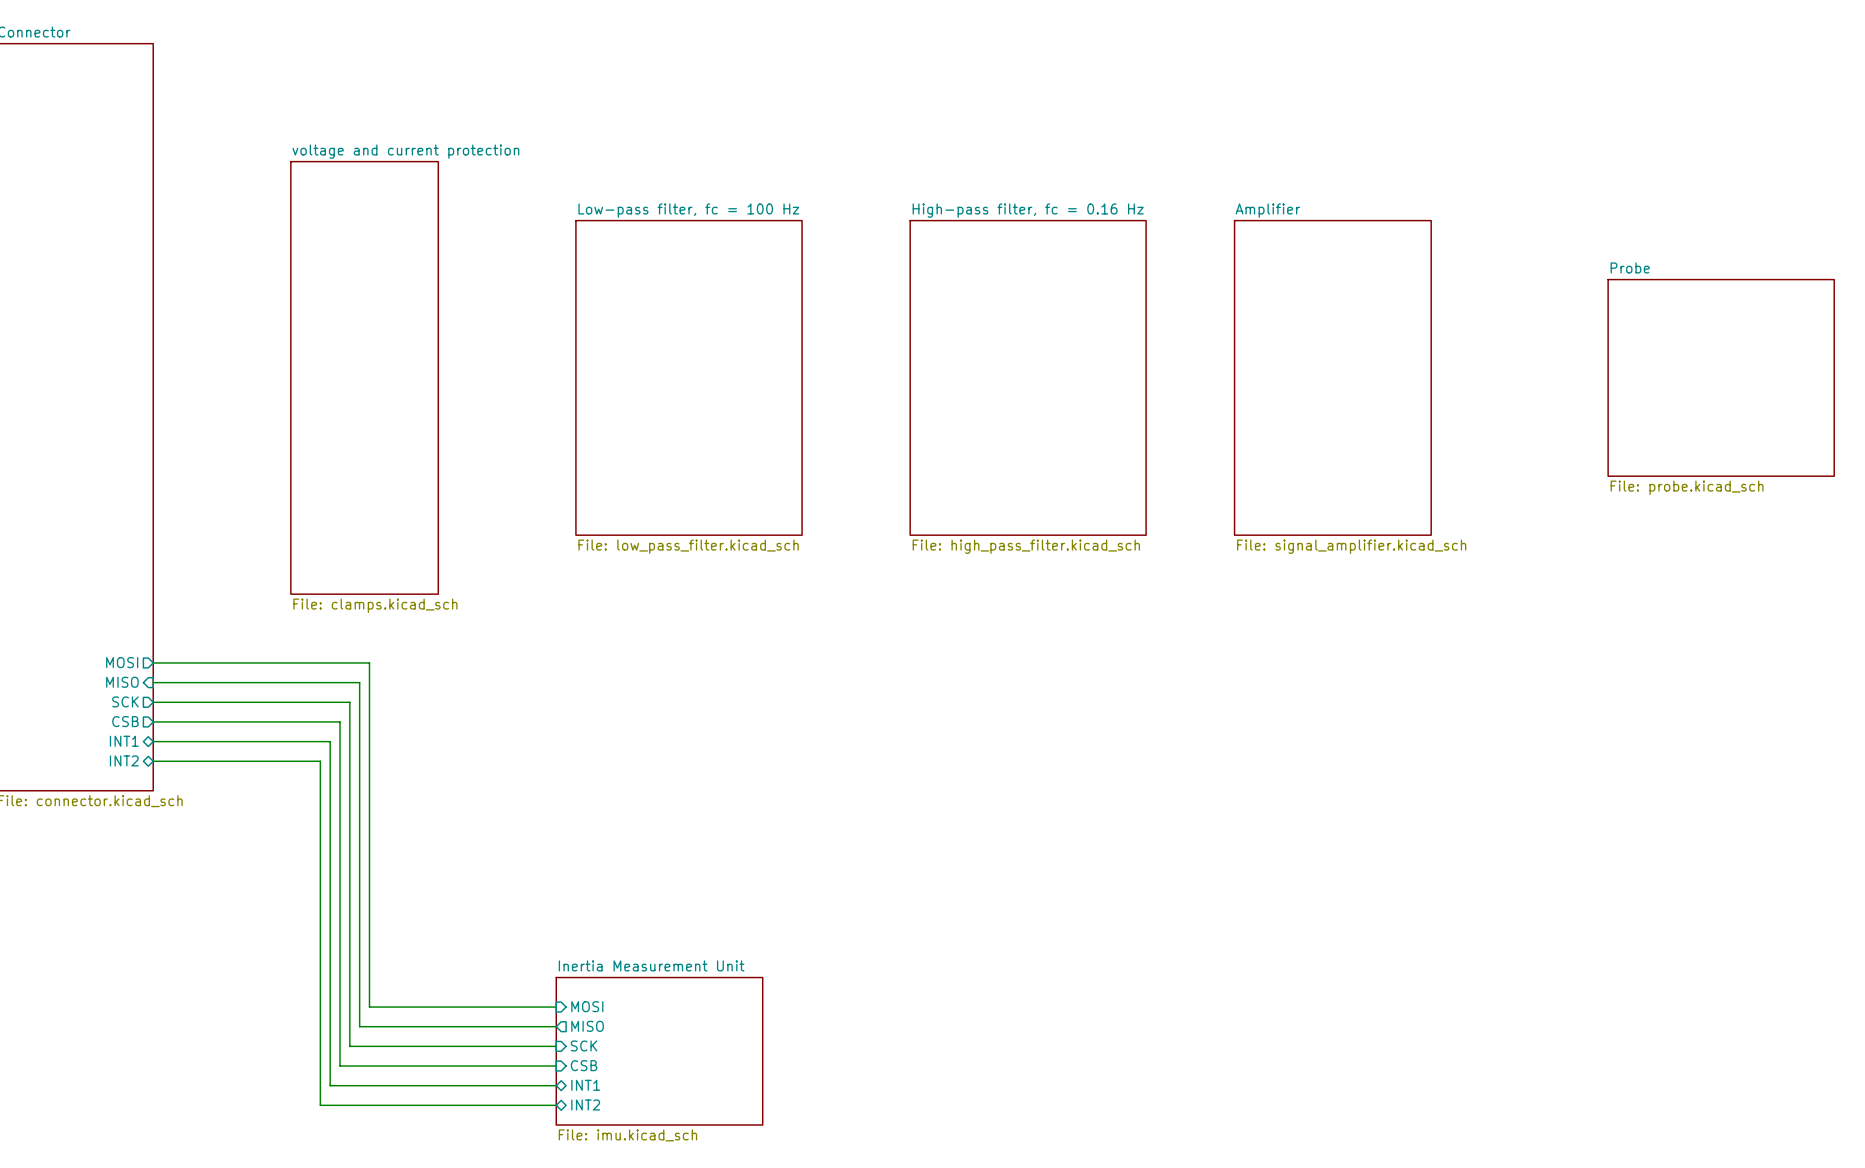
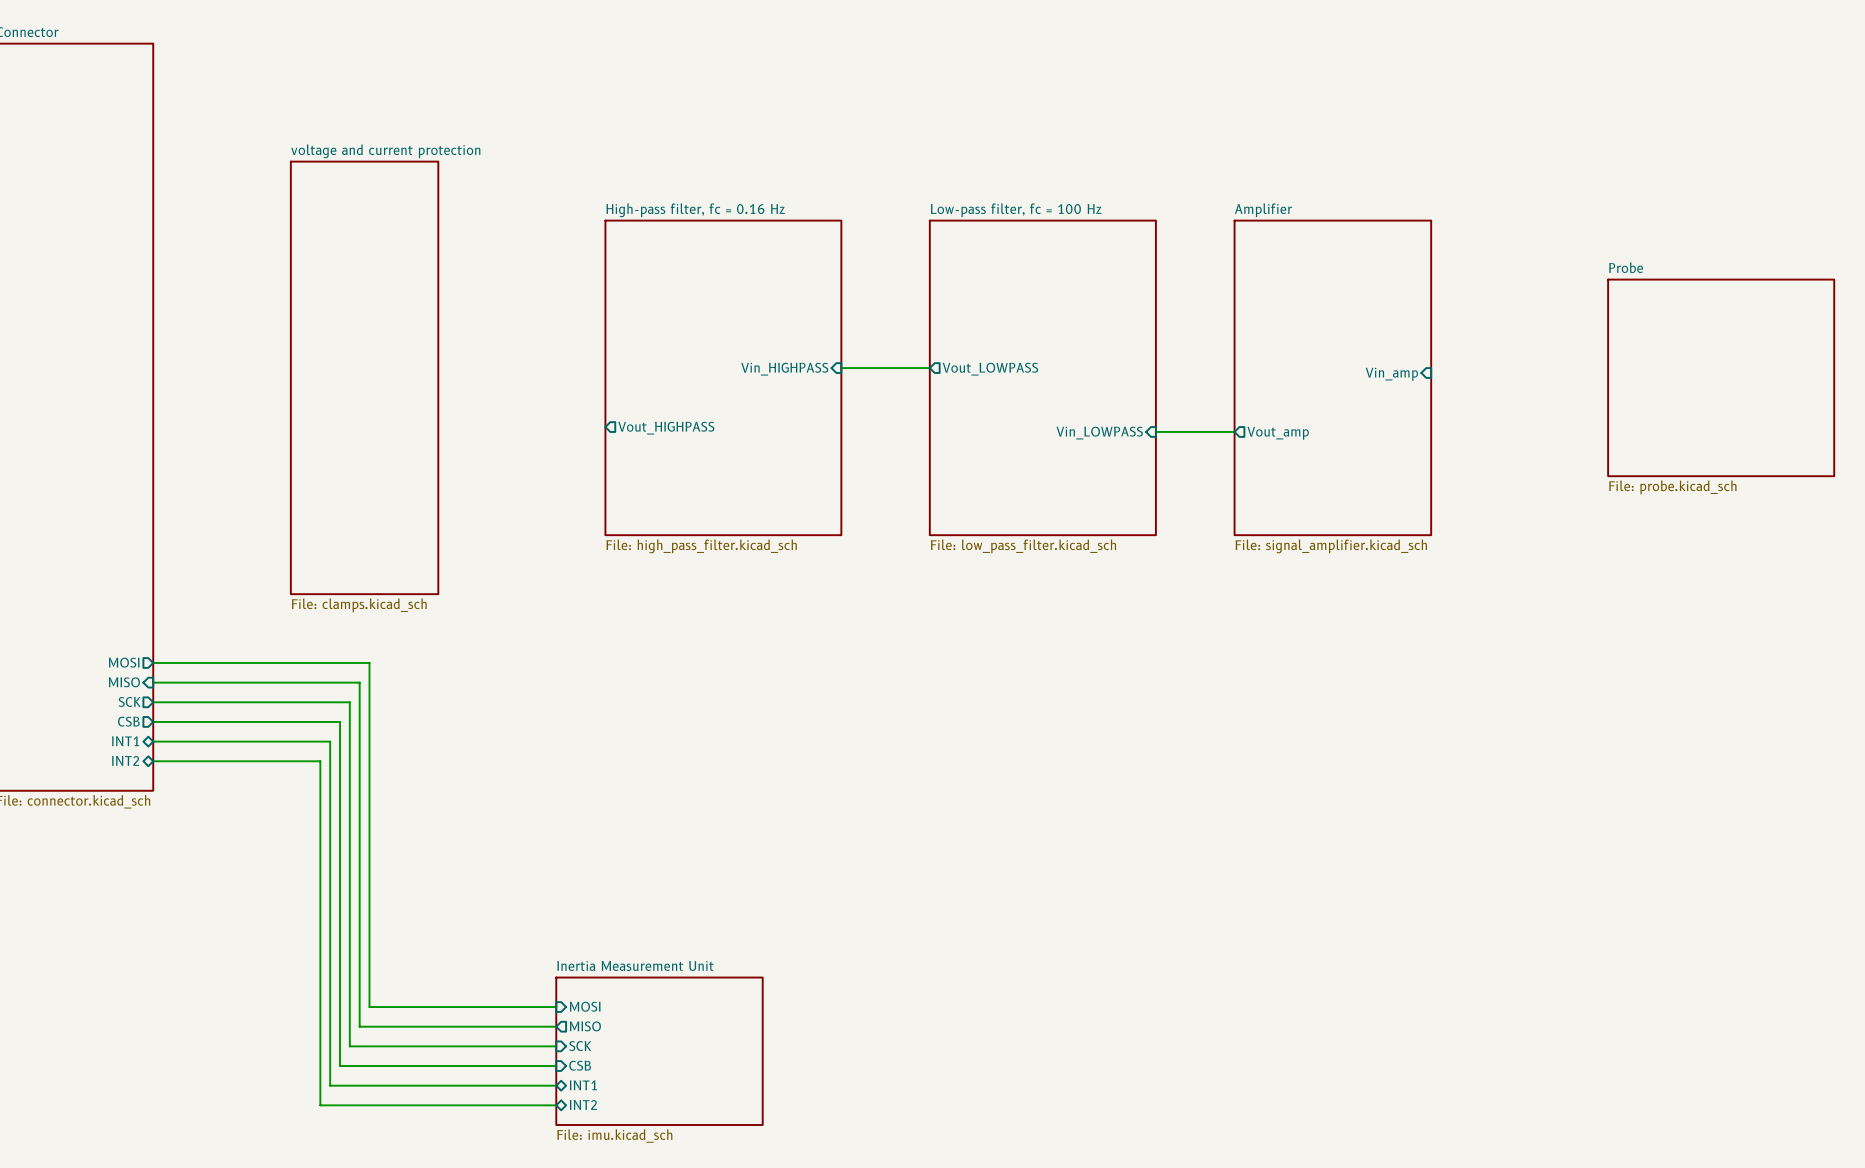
sheet pin: none -> Vin_HIGHPASS (784, 369)
wire: none -> (841, 368) (929, 368)
sheet pin: none -> Vout_LOWPASS (990, 369)
sheet pin: none -> Vin_amp (1391, 374)
sheet Low-pass filter, fc = 100 Hz position: (688, 377) -> (1042, 377)
sheet High-pass filter, fc = 0.16 Hz position: (1028, 377) -> (723, 377)
sheet pin: none -> Vout_HIGHPASS (666, 428)
wire: none -> (1155, 431) (1234, 431)
sheet pin: none -> Vin_LOWPASS (1099, 433)
sheet pin: none -> Vout_amp (1278, 433)

